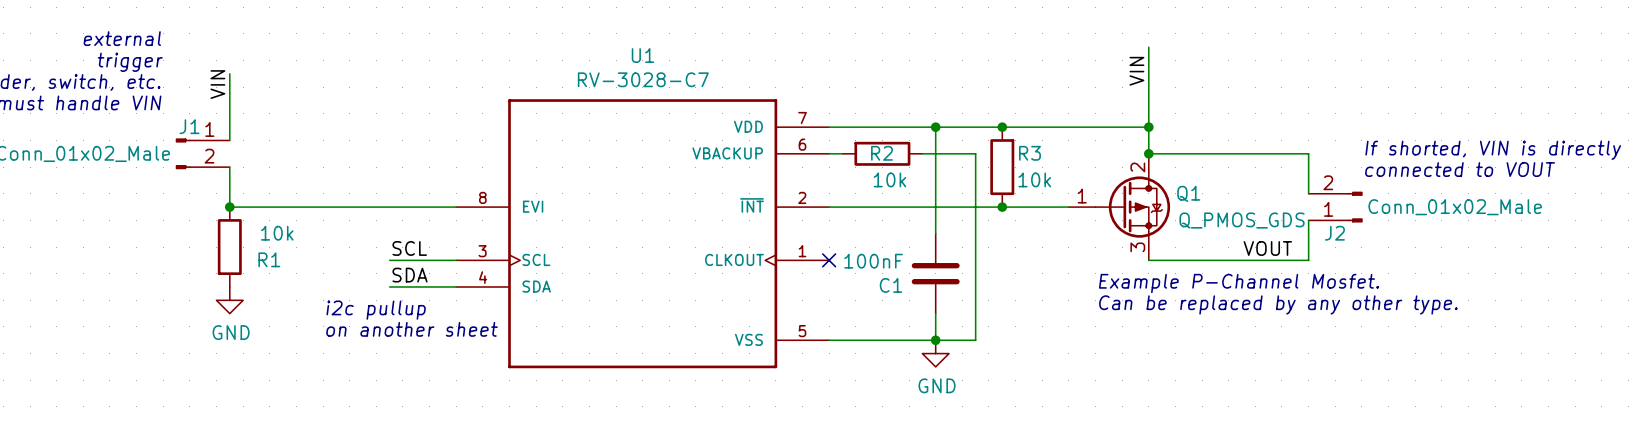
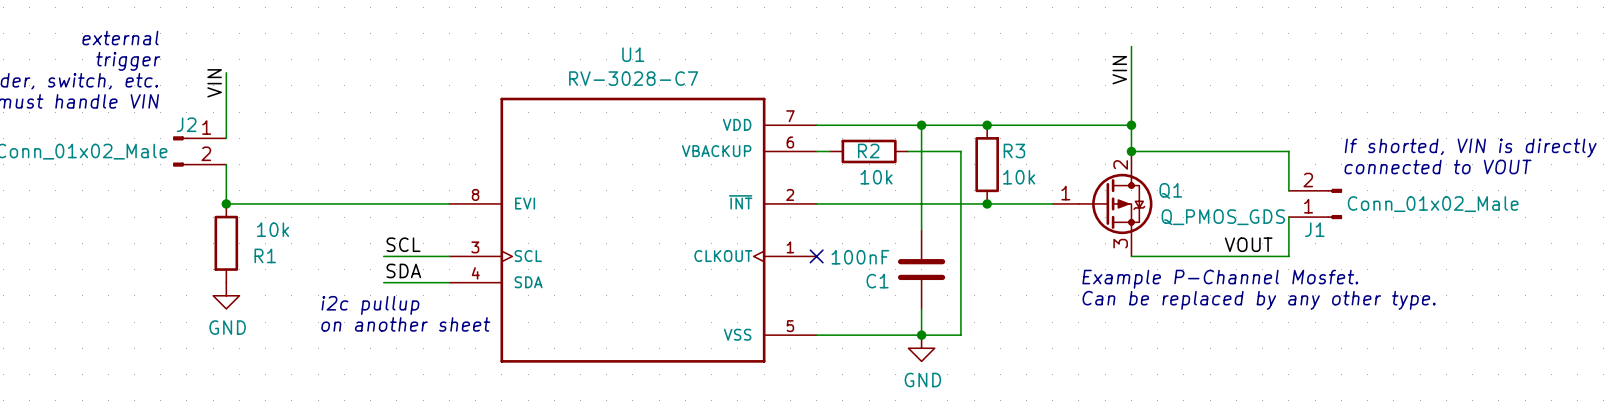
J1 name: J1 (189, 126) -> J2 (186, 124)
J2 name: J2 (1334, 233) -> J1 (1314, 229)

